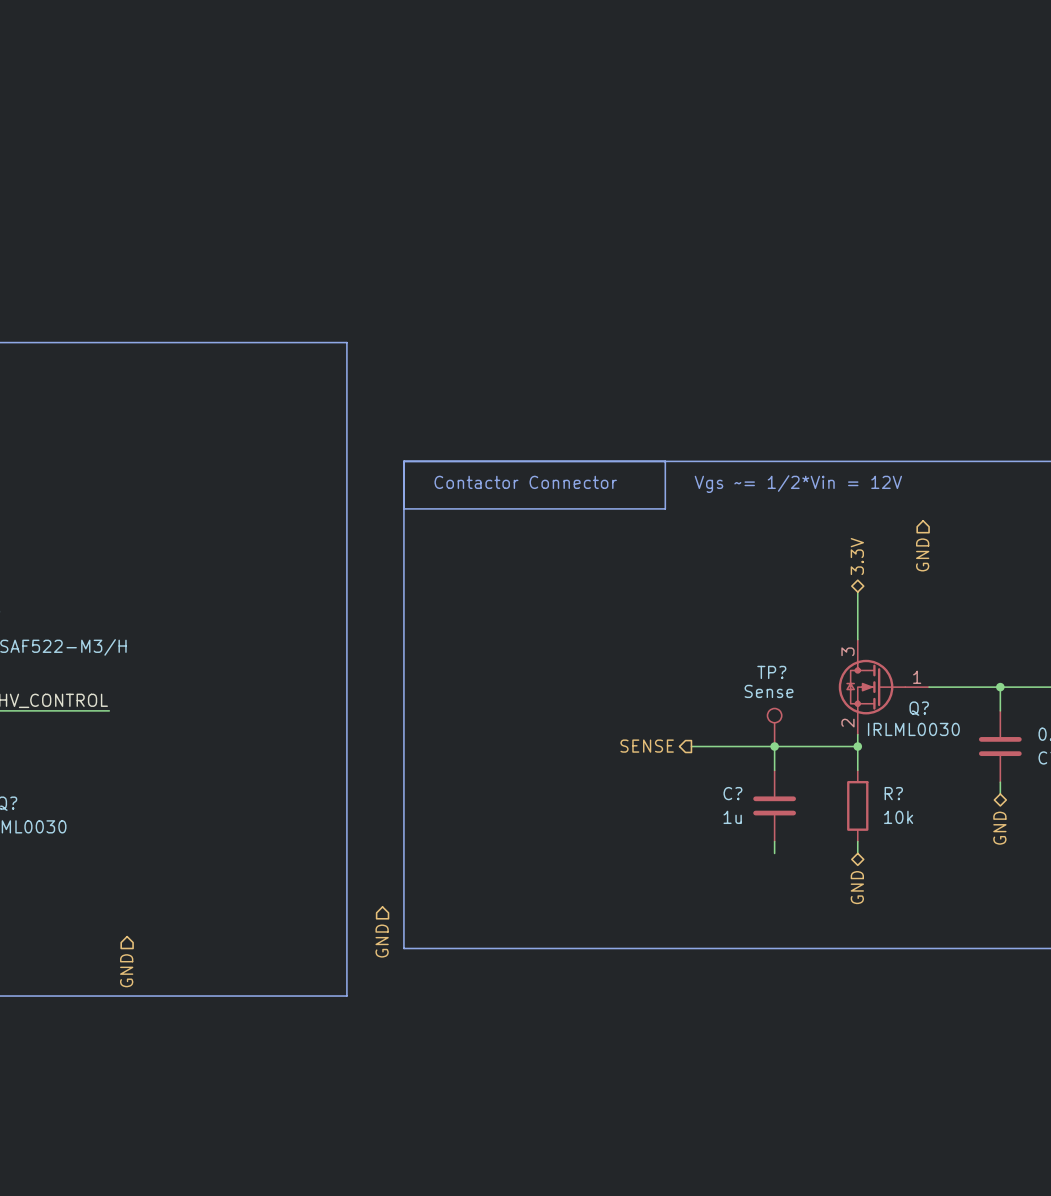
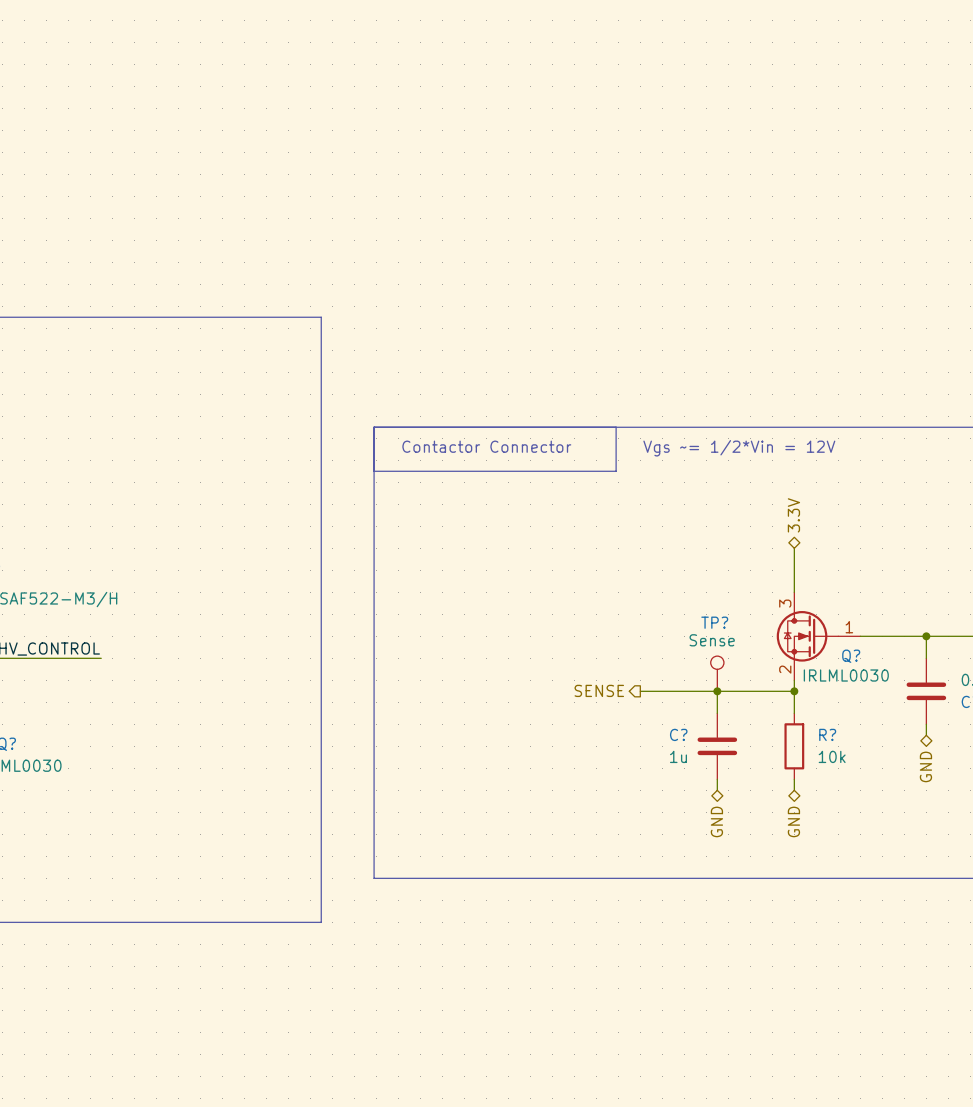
hierarchical label: GND (922, 554) -> none
hierarchical label: none -> GND (716, 821)
hierarchical label: GND (382, 941) -> none
hierarchical label: GND (126, 970) -> none

